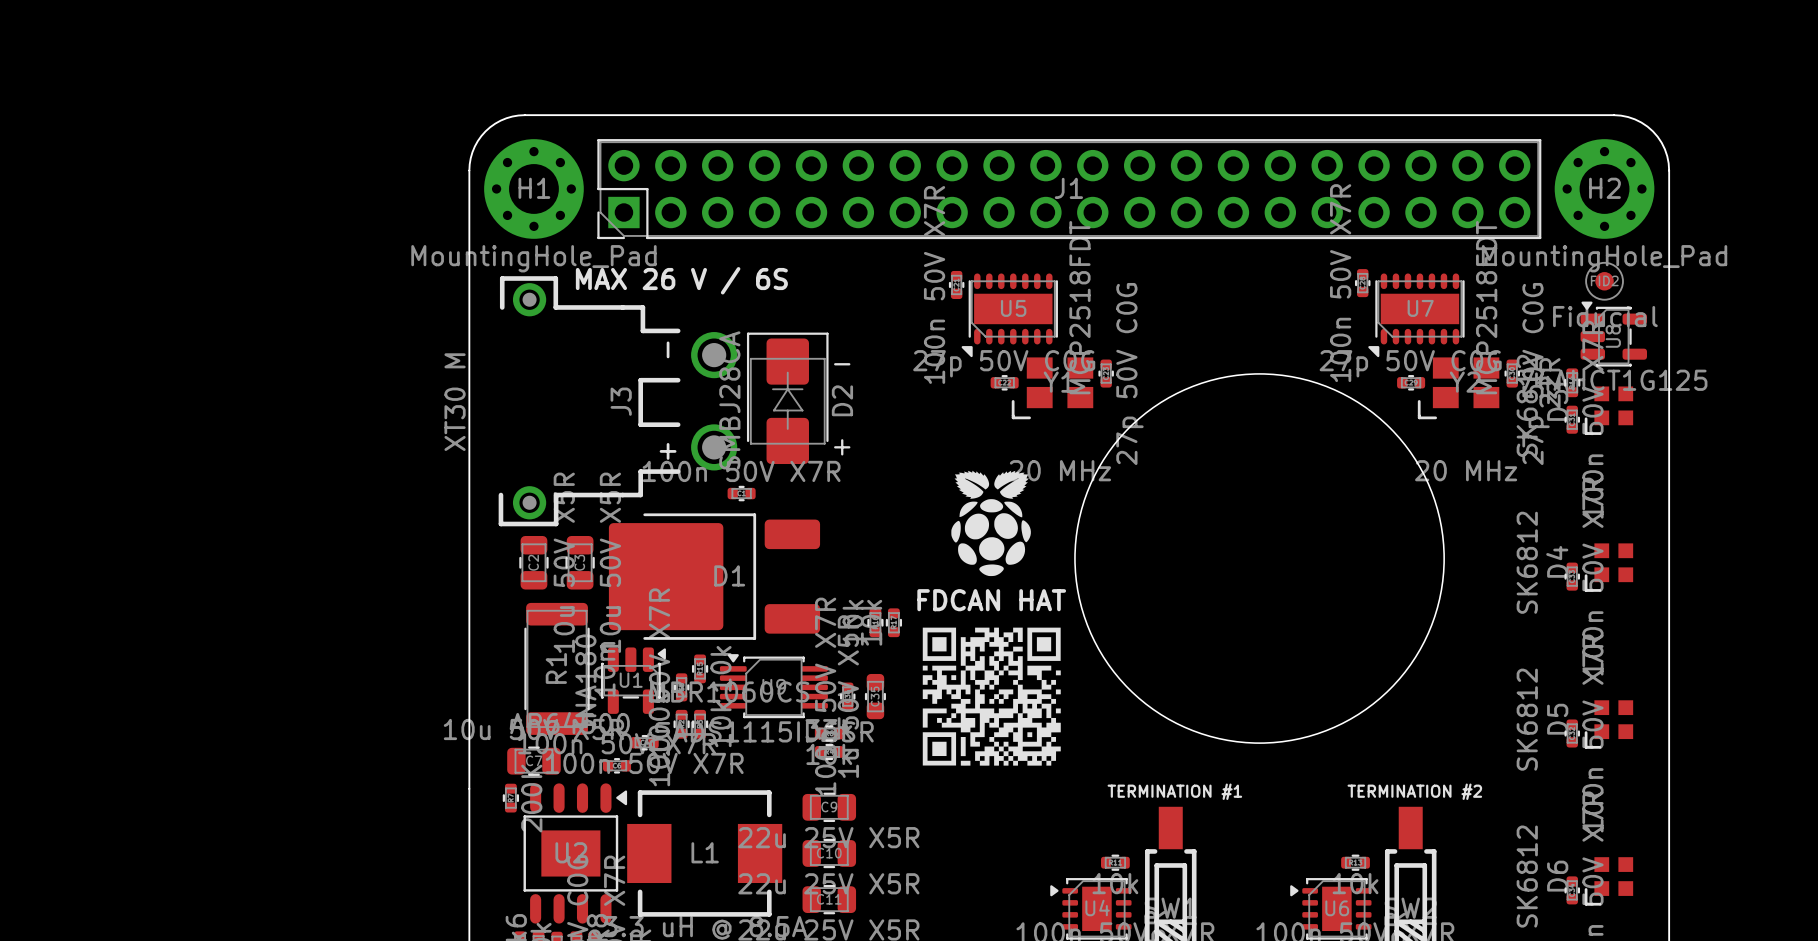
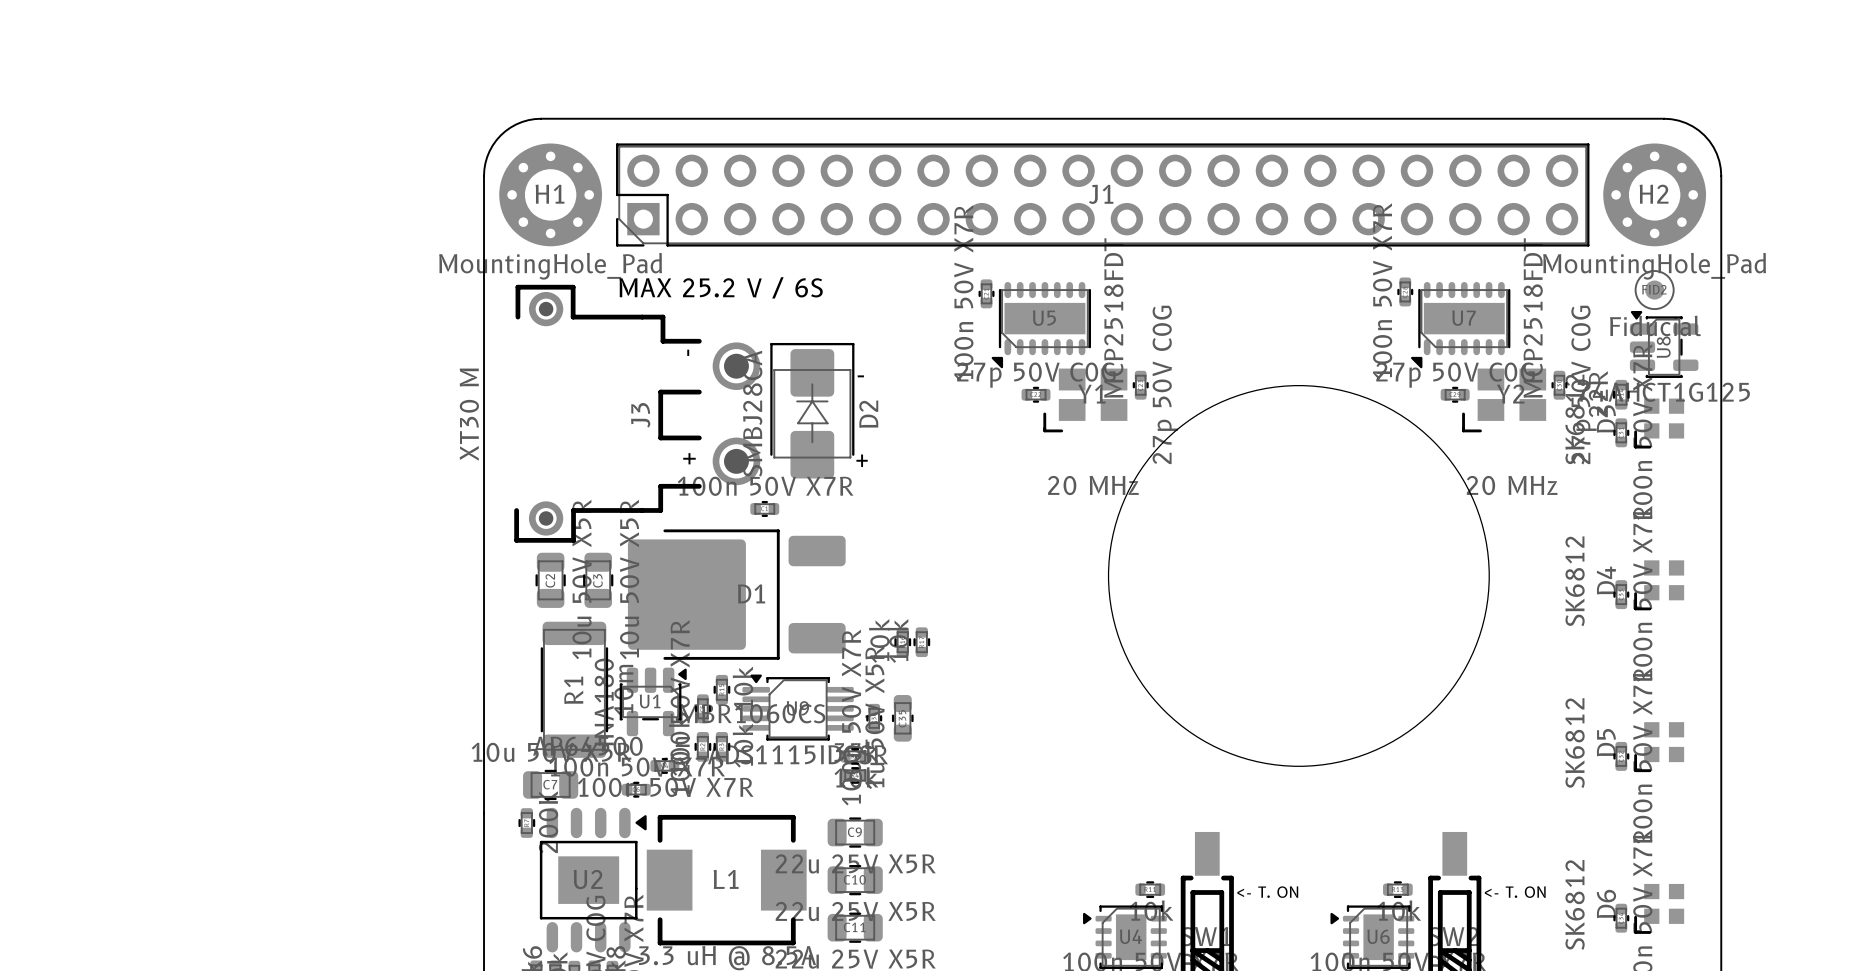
text: MAX 26 V / 6S (681, 280) -> MAX 25.2 V / 6S (721, 287)
drawing: [951, 470, 1031, 577] -> none
text: FDCAN HAT (991, 600) -> none
drawing: [922, 627, 1061, 766] -> none
text: TERMINATION #1 (1174, 791) -> none
text: TERMINATION #2 (1414, 791) -> none
text: none -> <- T. ON (1267, 892)
text: none -> <- T. ON (1515, 892)

